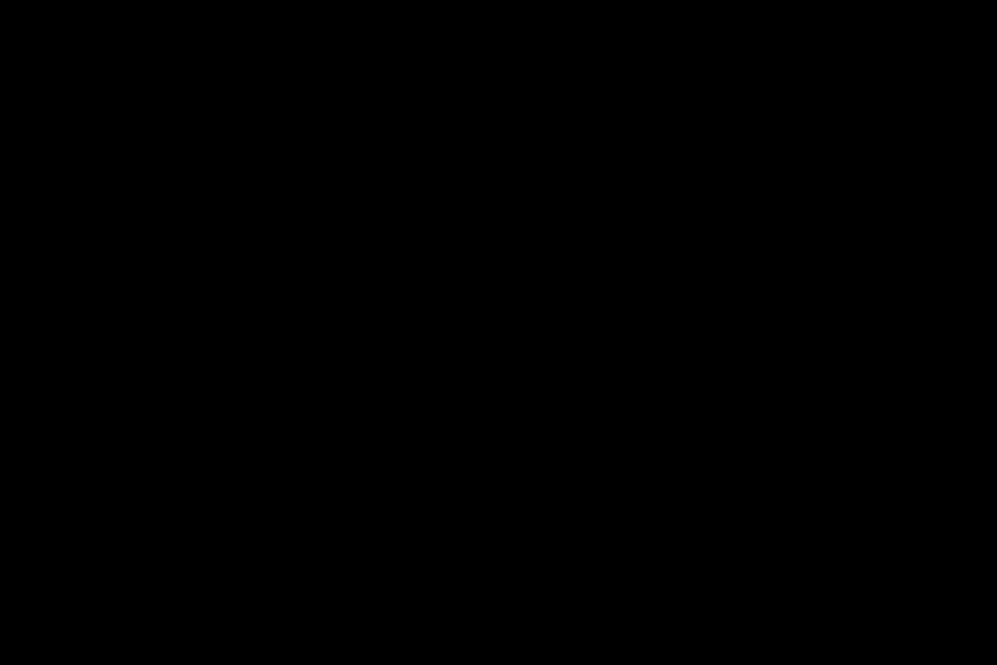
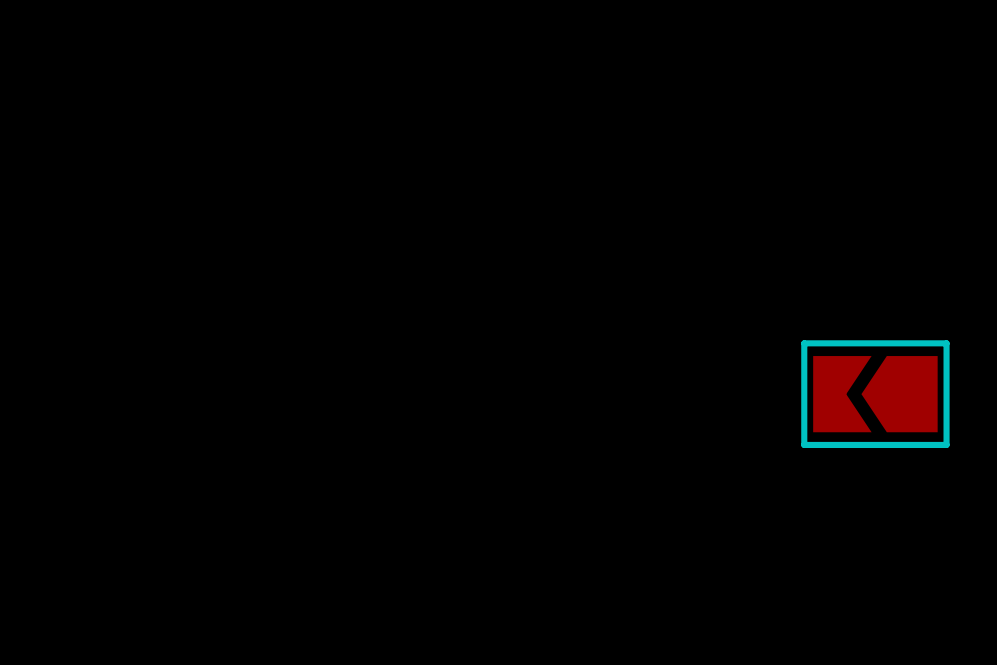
part: none -> (875, 394)

